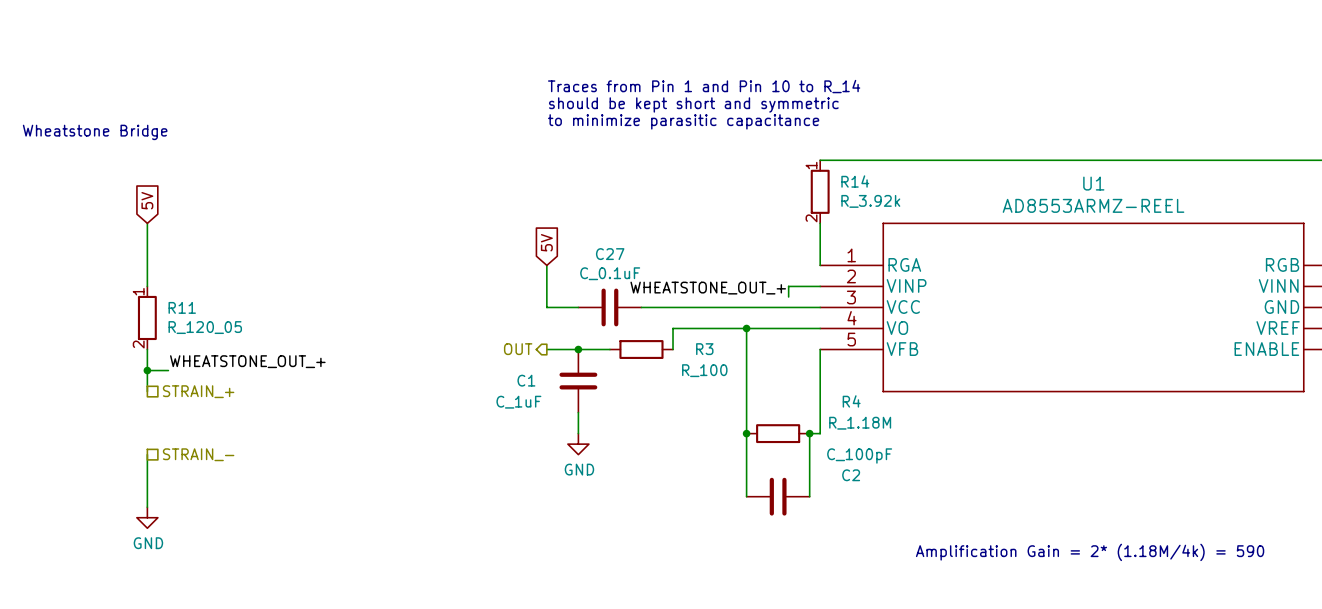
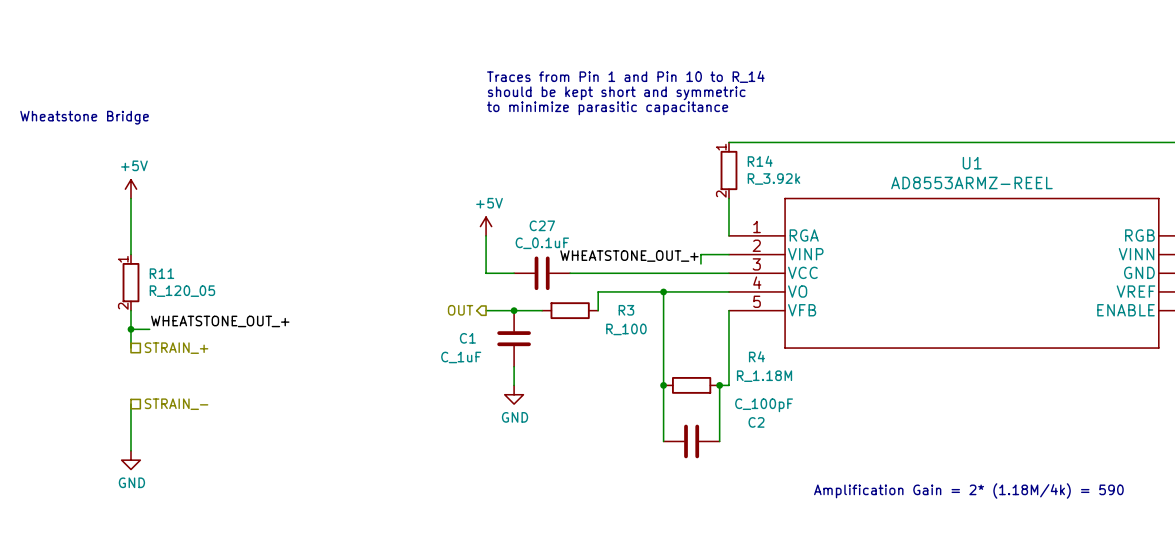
global label: 5V (147, 200) -> none
power symbol: none -> +5V (130, 189)
global label: 5V (546, 242) -> none
power symbol: none -> +5V (486, 226)

